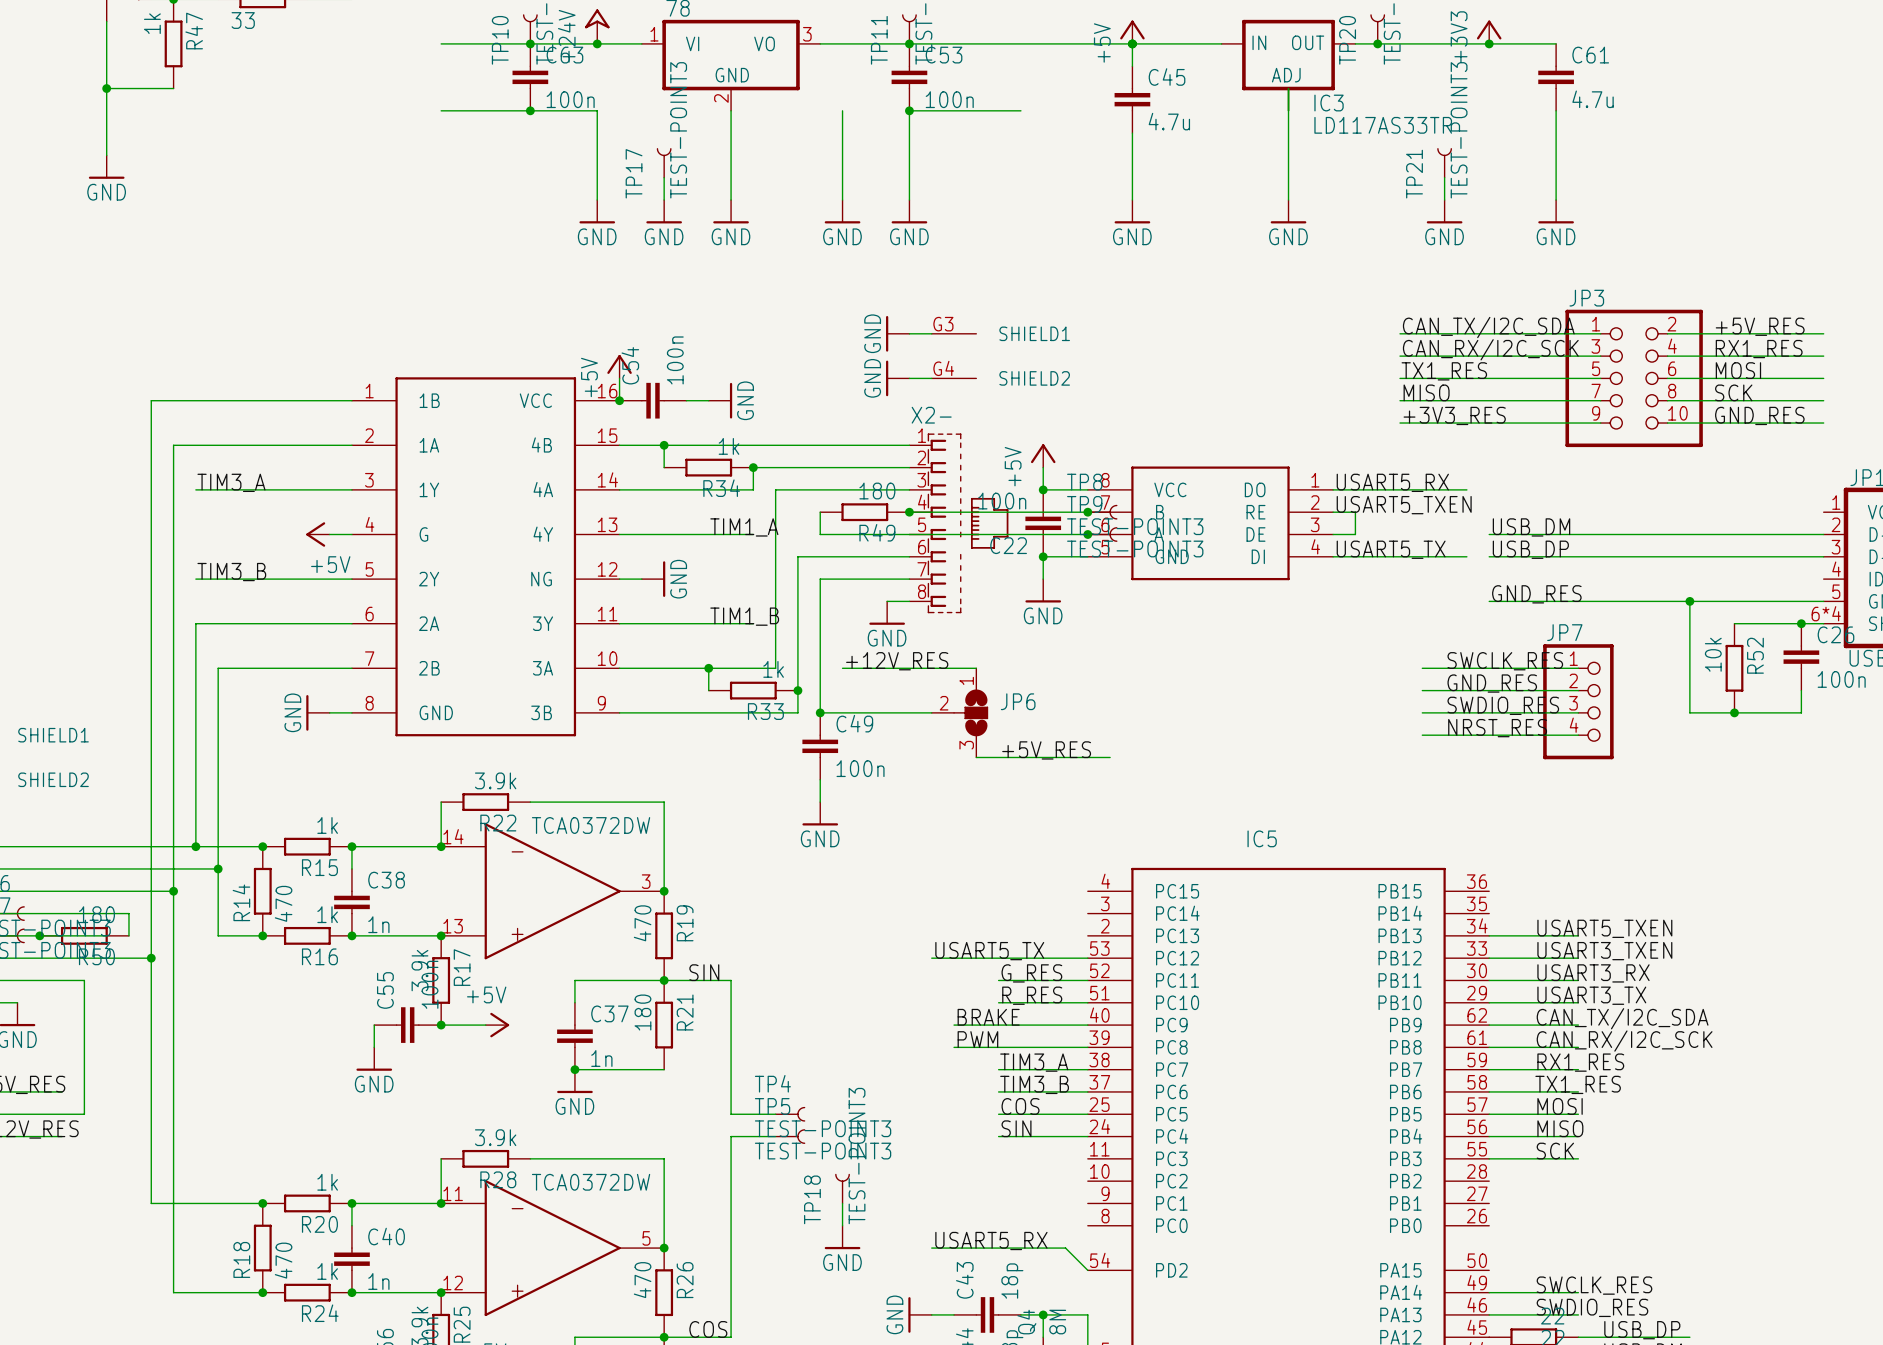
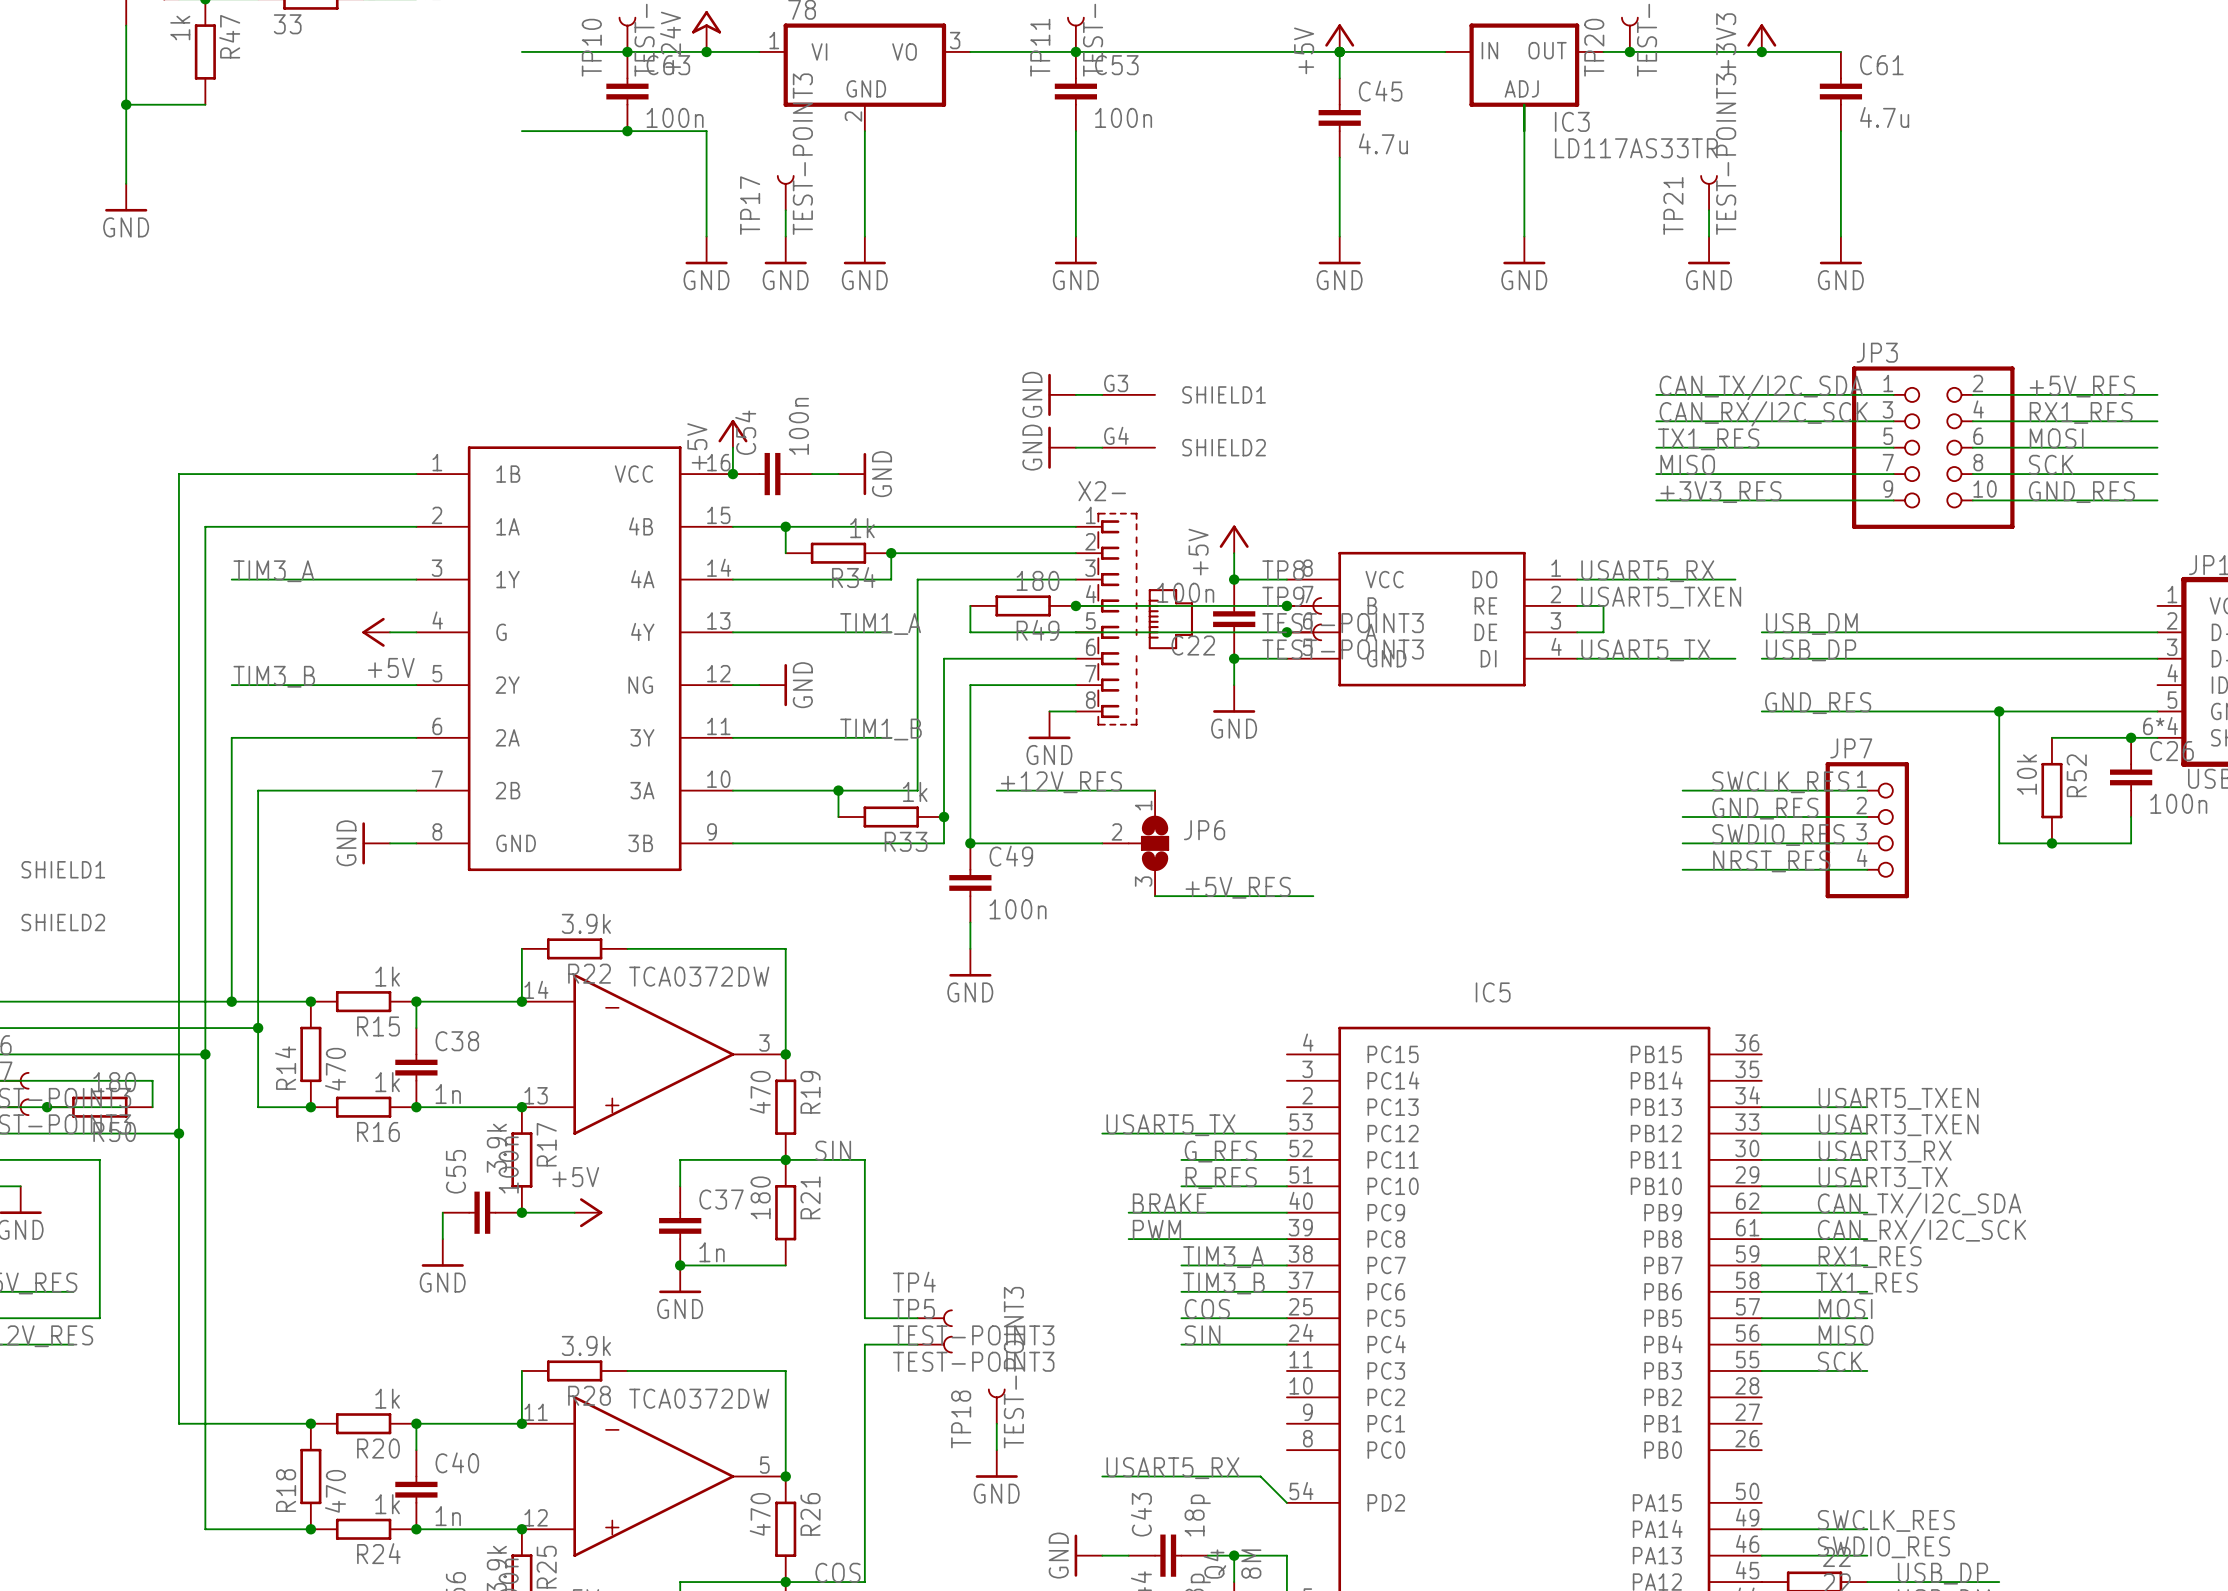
wire: (842, 110) (842, 200) -> none
wire: (909, 110) (1020, 110) -> none
junction: (909, 110) -> none
power symbol: GND (842, 211) -> none

